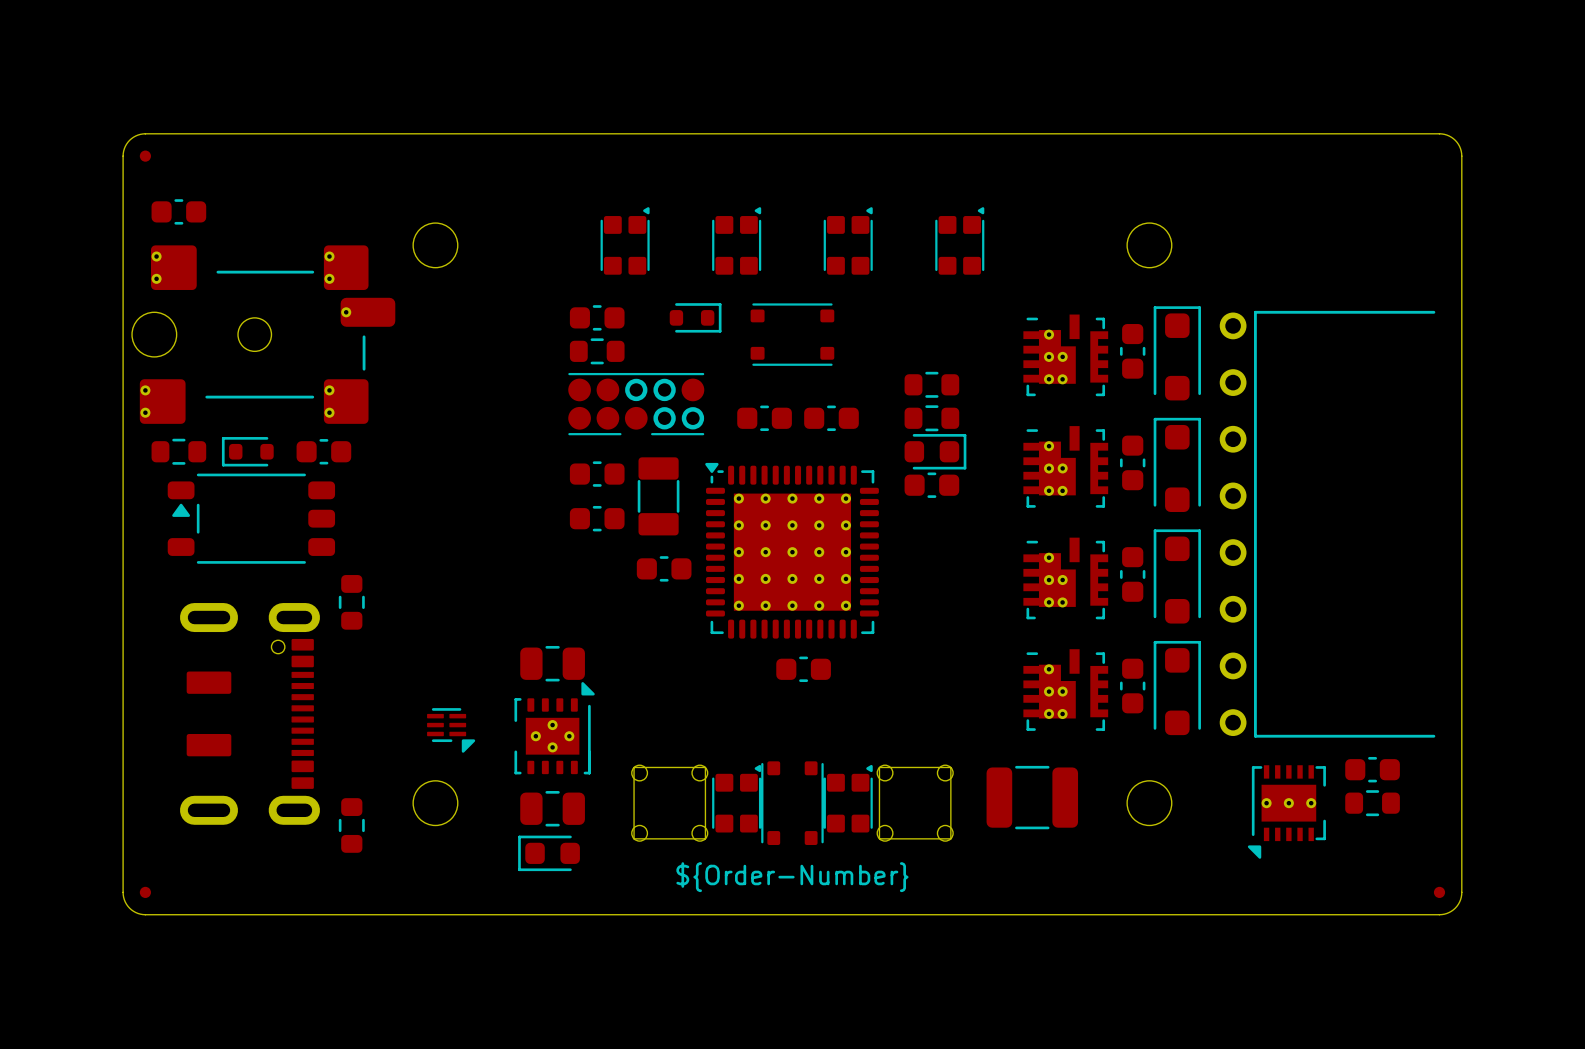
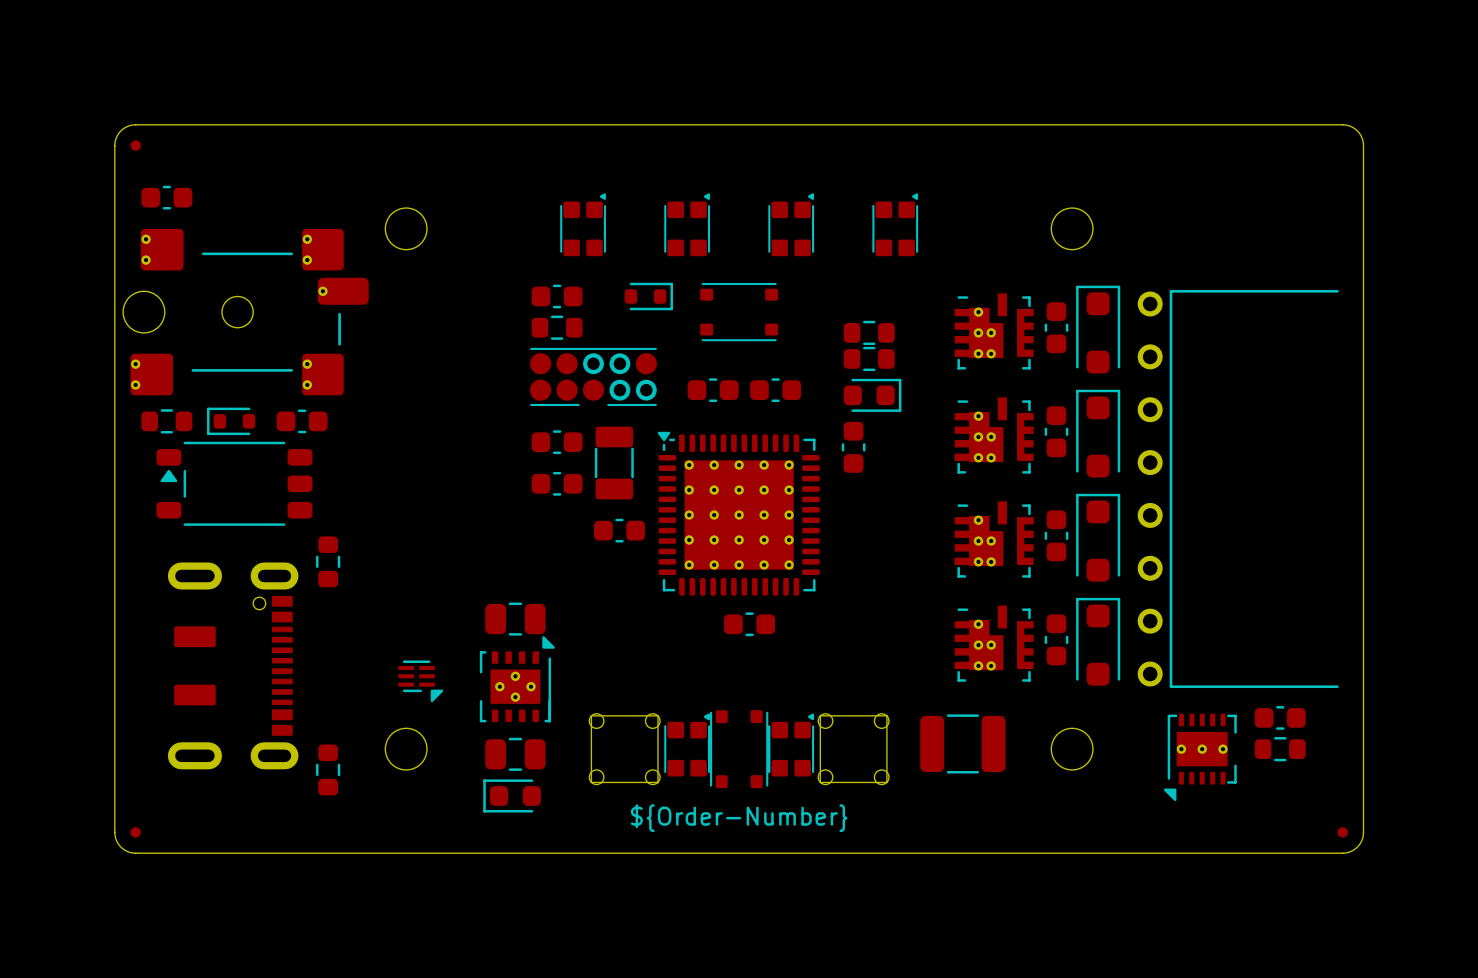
part: none -> (869, 332)
part footprint: [904, 405, 960, 432] -> [843, 378, 902, 412]
part: (935, 451) -> none
part rotation: 0° (931, 485) -> 90° clockwise (853, 447)

